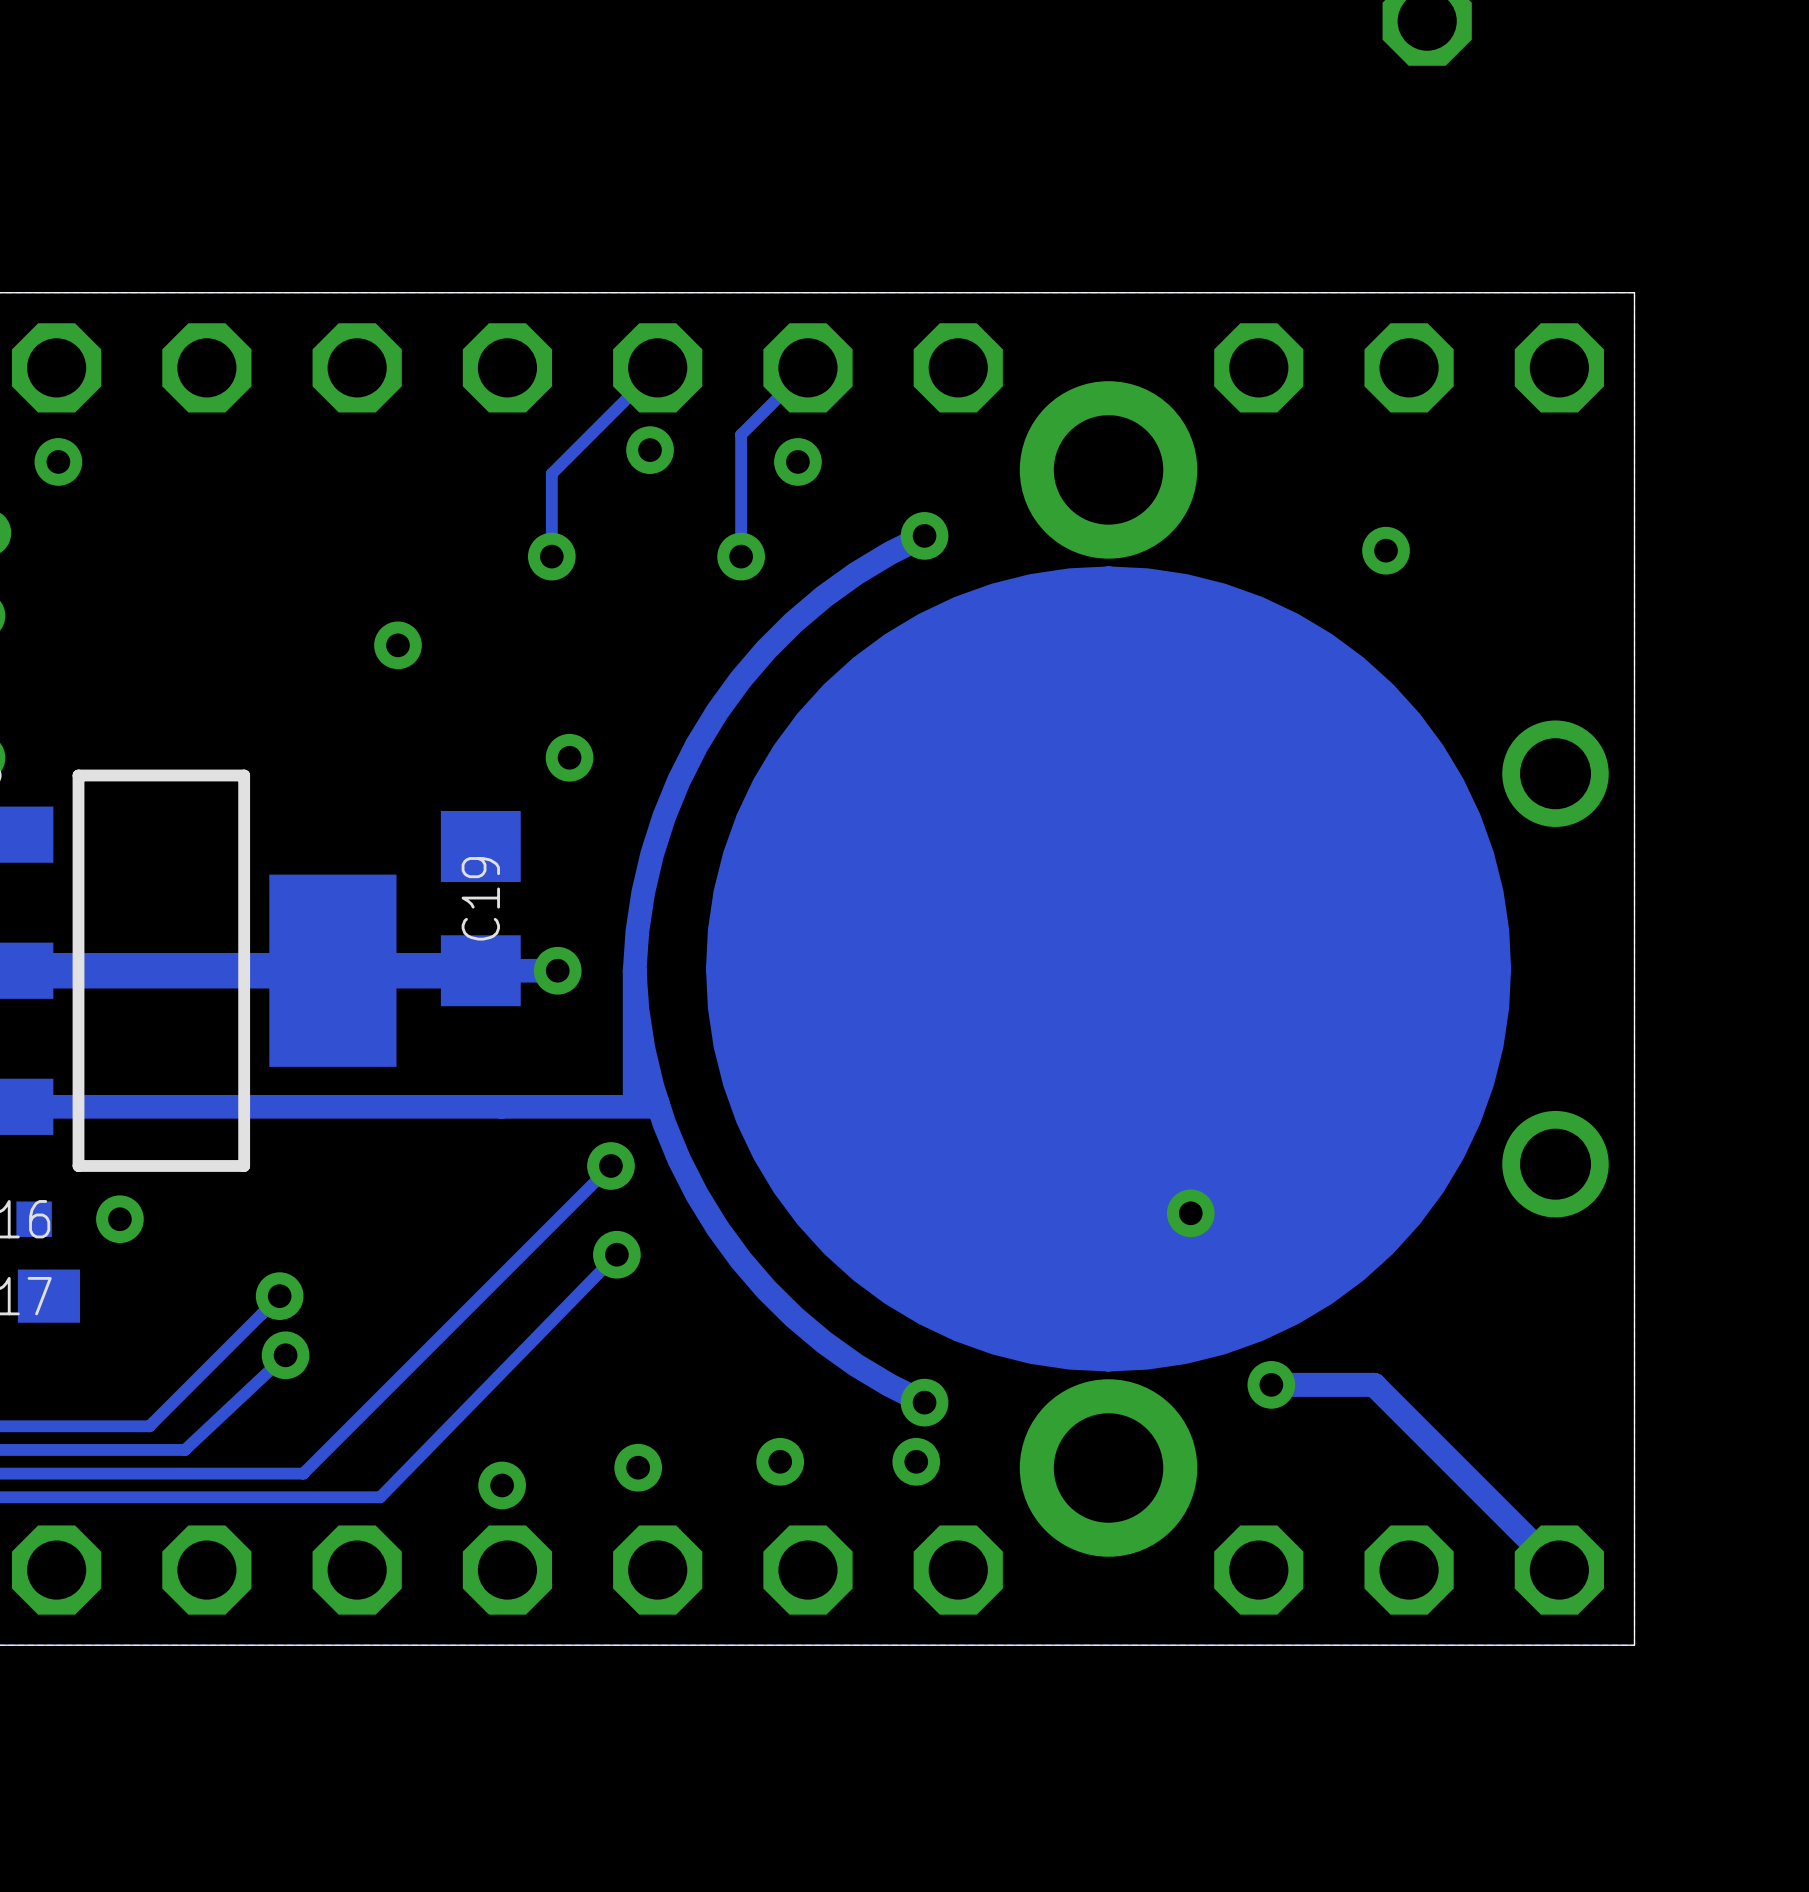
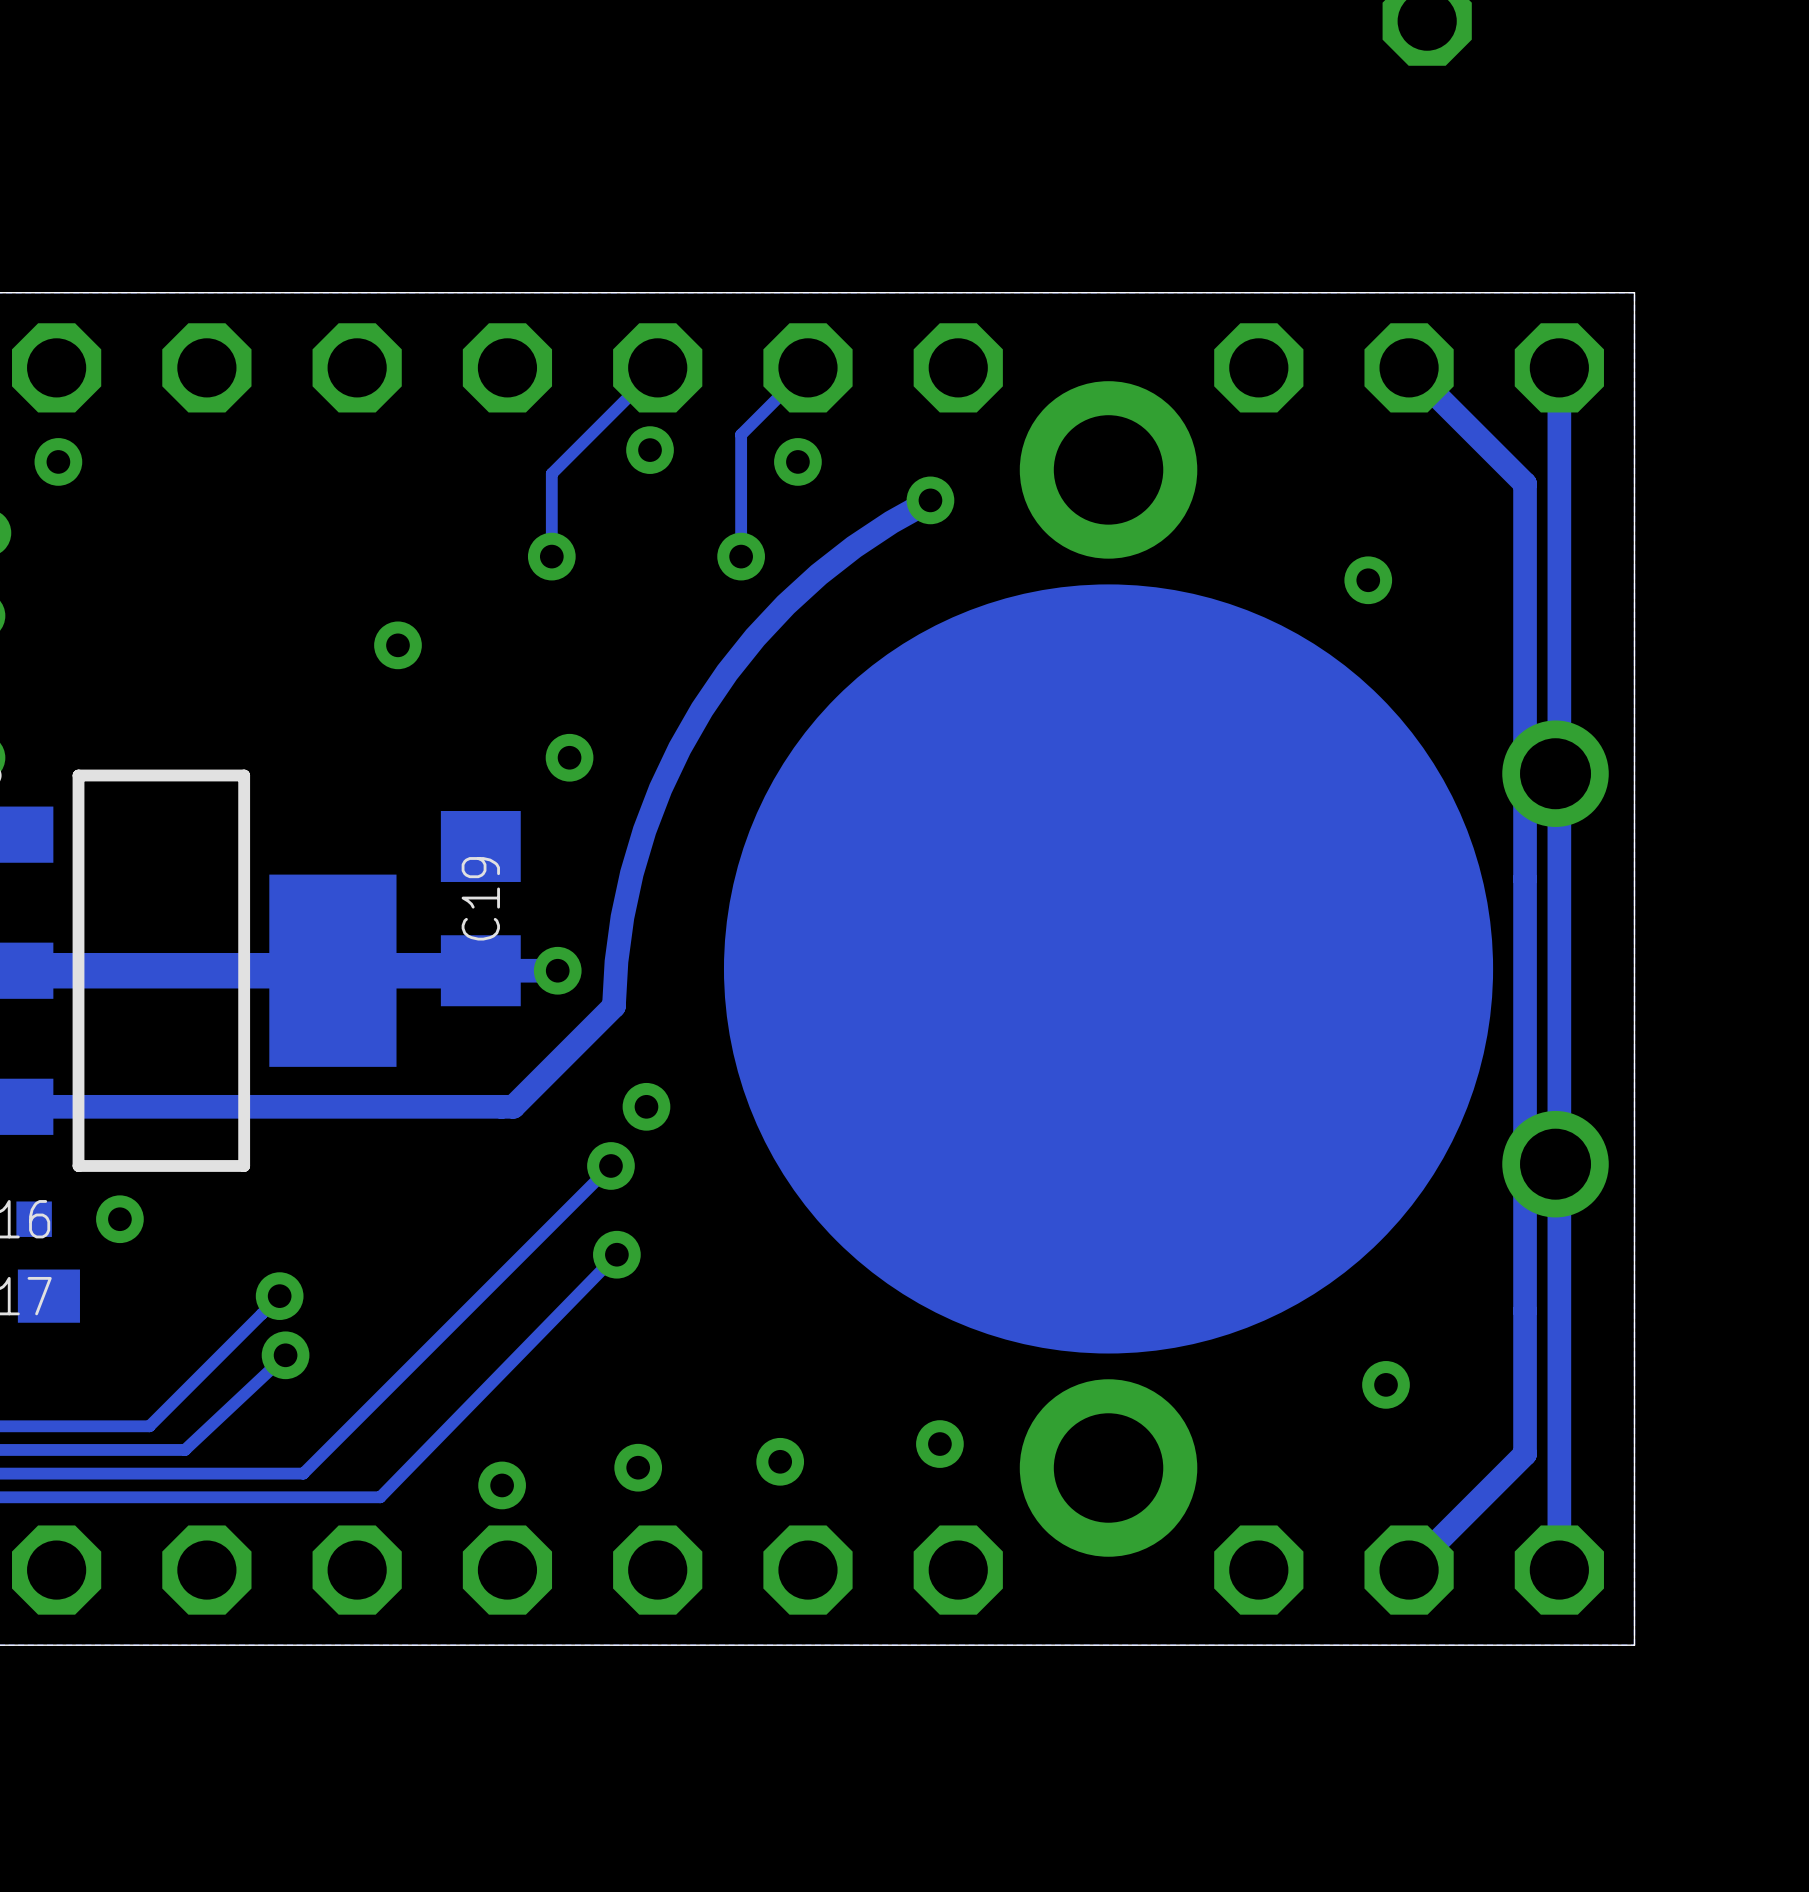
track: none -> (1409, 367) (1525, 483) (1525, 1454) (1409, 1570)
track: (924, 535) (889, 553) (855, 573) (823, 596) (793, 622) (765, 650) (740, 679) (717, 711) (696, 745) (678, 780) (664, 816) (652, 854) (643, 892) (637, 931) (634, 970) -> none
via position: (924, 535) -> (930, 500)
via position: (1386, 550) -> (1368, 580)
track: (1108, 578) (1146, 580) (1184, 585) (1221, 595) (1258, 607) (1292, 624) (1325, 644) (1356, 666) (1384, 692) (1410, 721) (1433, 751) (1453, 784) (1469, 819) (1482, 855) (1491, 892) (1497, 930) (1499, 968) (1497, 1007) (1491, 1045) (1482, 1082) (1469, 1118) (1453, 1153) (1433, 1186) (1410, 1216) (1384, 1245) (1356, 1270) (1325, 1293) (1292, 1313) (1258, 1329) (1221, 1342) (1184, 1352) (1146, 1357) (1108, 1359) (1070, 1357) (1032, 1352) (995, 1342) (959, 1329) (924, 1313) (891, 1293) (860, 1270) (832, 1245) (806, 1216) (783, 1186) (763, 1153) (747, 1118) (734, 1082) (725, 1045) (719, 1007) (717, 968) (719, 930) (725, 892) (734, 855) (747, 819) (763, 784) (783, 751) (806, 721) (832, 692) (860, 666) (891, 644) (924, 624) (959, 607) (995, 595) (1032, 585) (1070, 580) (1108, 578) -> none
track: (634, 970) (634, 1104) (657, 1104) (657, 1106) (513, 1106) -> (930, 500) (891, 522) (854, 546) (818, 574) (785, 604) (755, 637) (727, 672) (702, 709) (679, 748) (660, 788) (644, 830) (631, 873) (622, 917) (616, 961) (613, 1006) (513, 1106)
track: (634, 970) (637, 1009) (643, 1048) (652, 1086) (664, 1123) (679, 1160) (697, 1194) (717, 1228) (740, 1259) (766, 1289) (794, 1317) (824, 1342) (855, 1365) (889, 1385) (924, 1402) -> none
via: none -> (646, 1106)
via: (1190, 1213) -> none
track: (1271, 1384) (1374, 1384) (1559, 1570) -> (1559, 367) (1559, 1570)
via position: (1271, 1384) -> (1386, 1384)
via: (924, 1402) -> none
via: none -> (939, 1444)
via: (916, 1461) -> none

